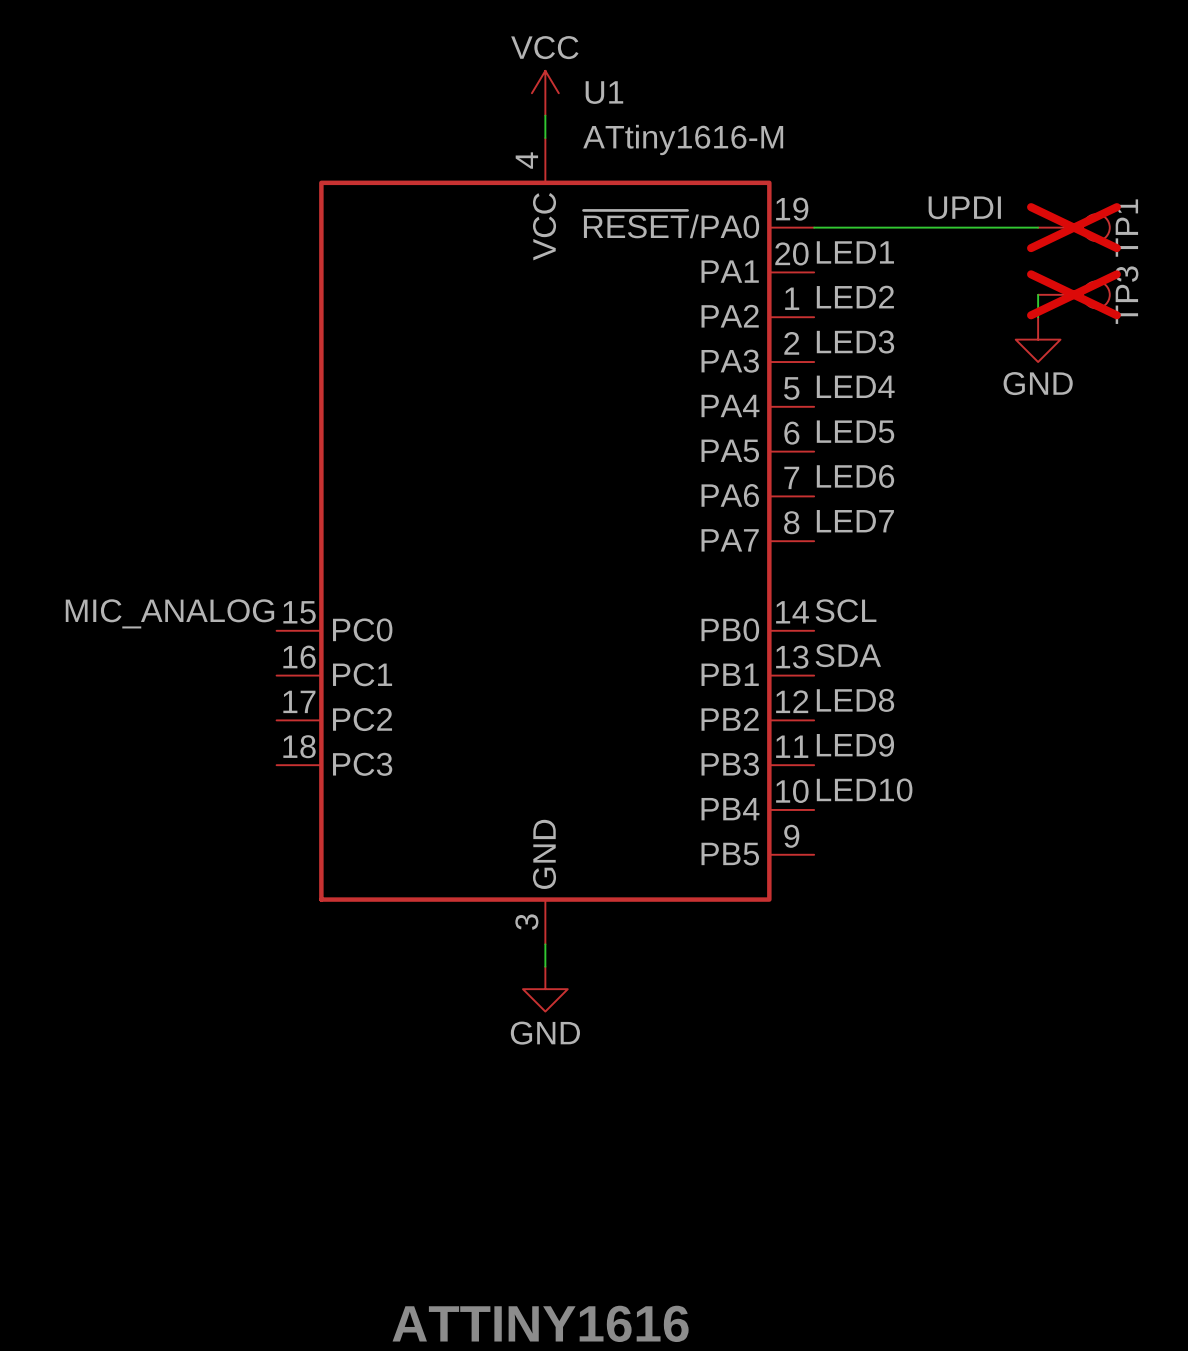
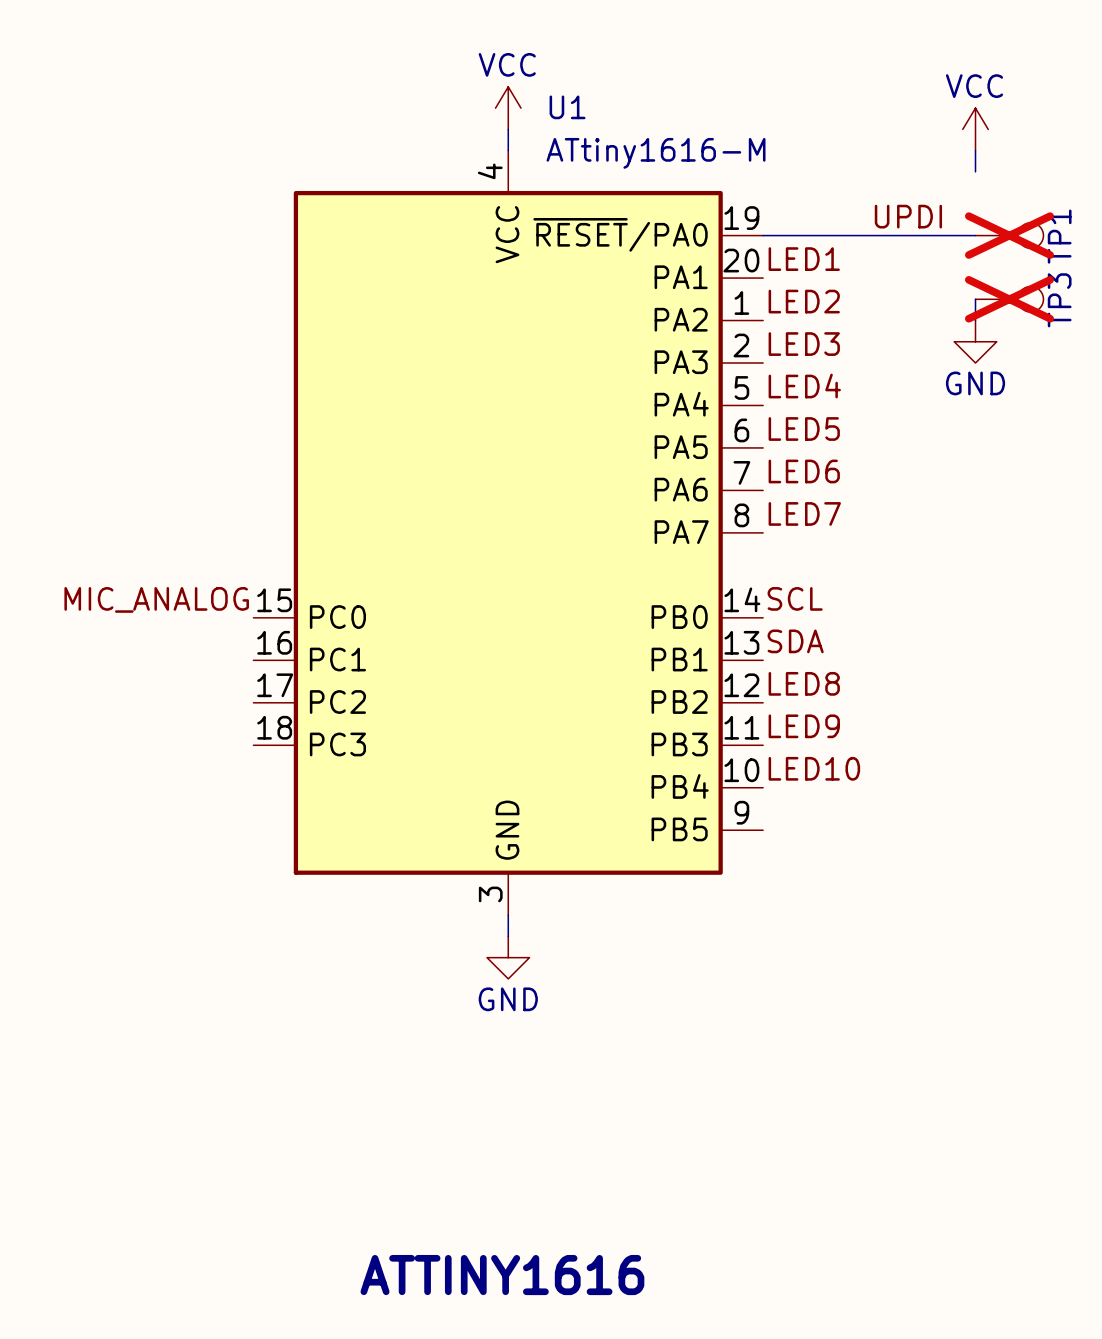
power symbol: none -> VCC (975, 129)
wire: none -> (975, 150) (975, 171)

